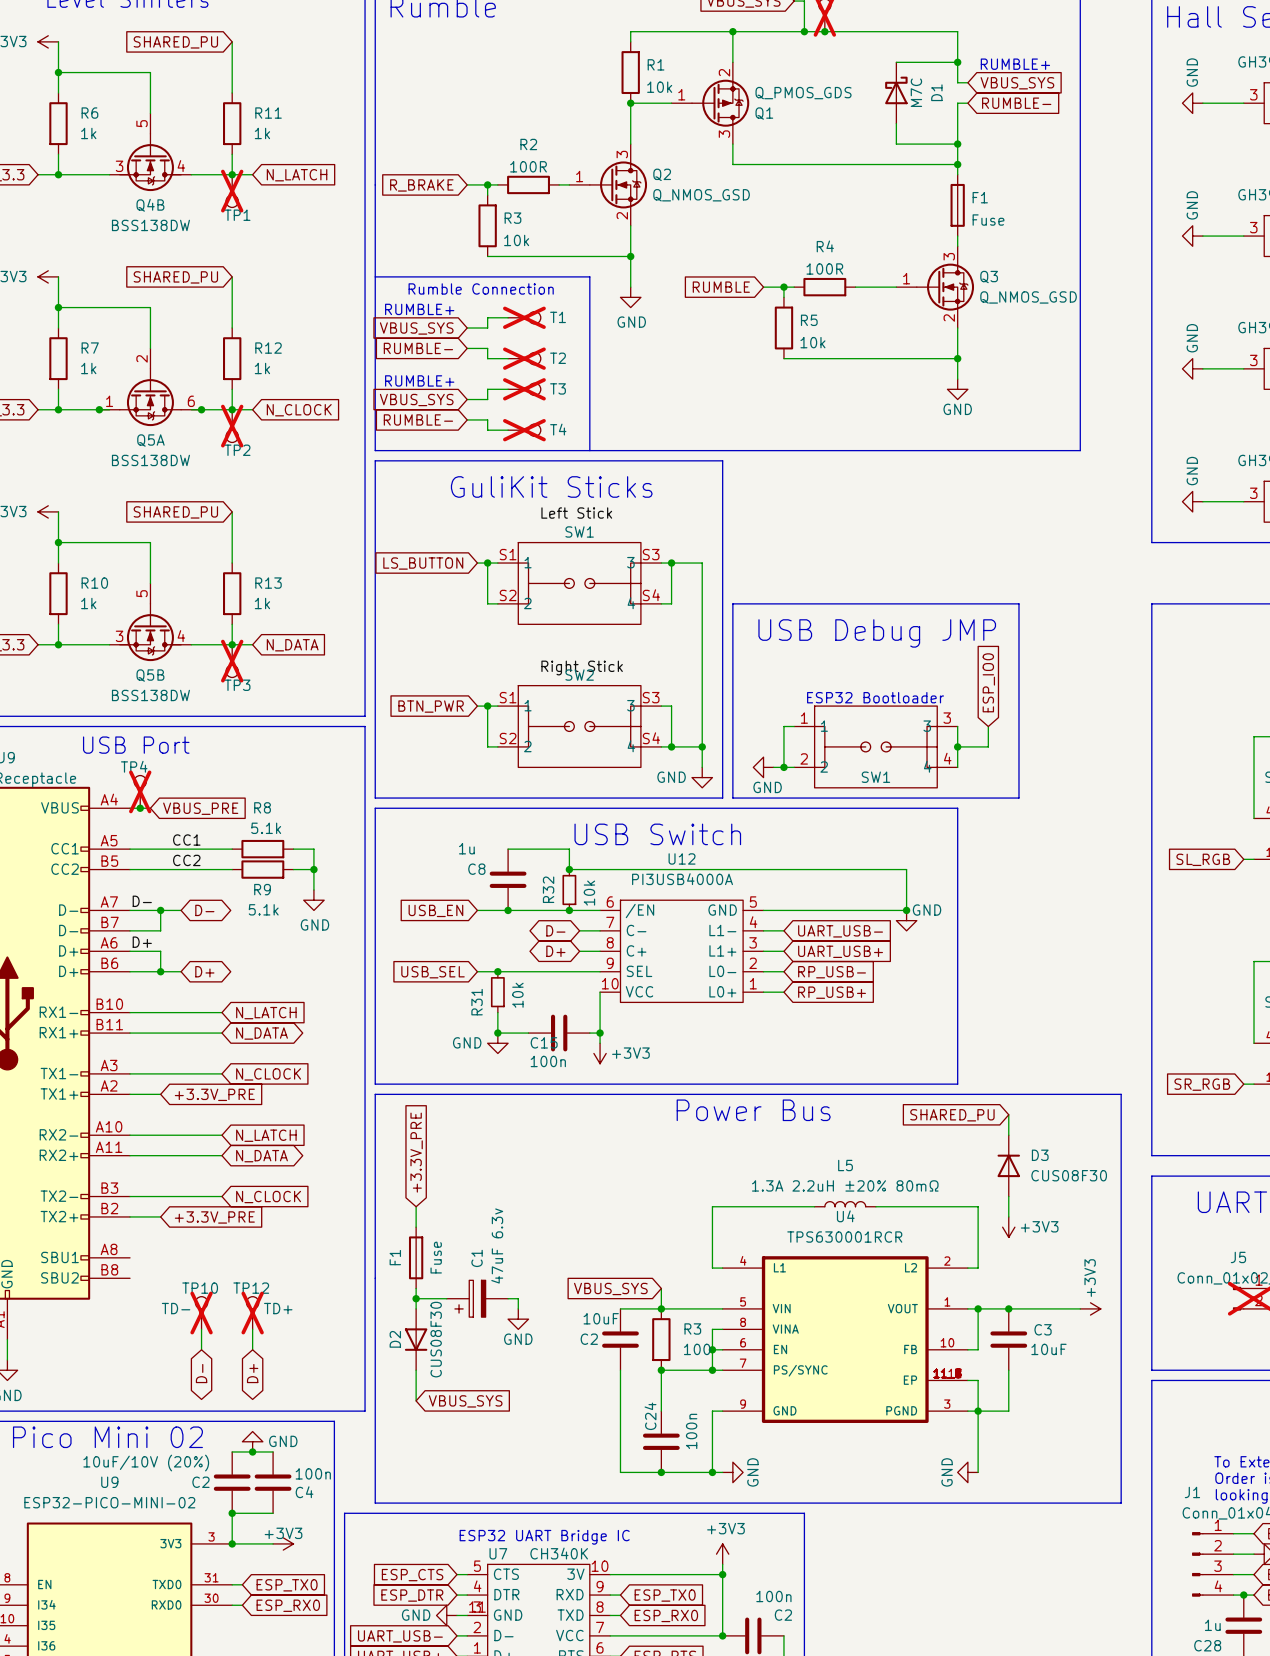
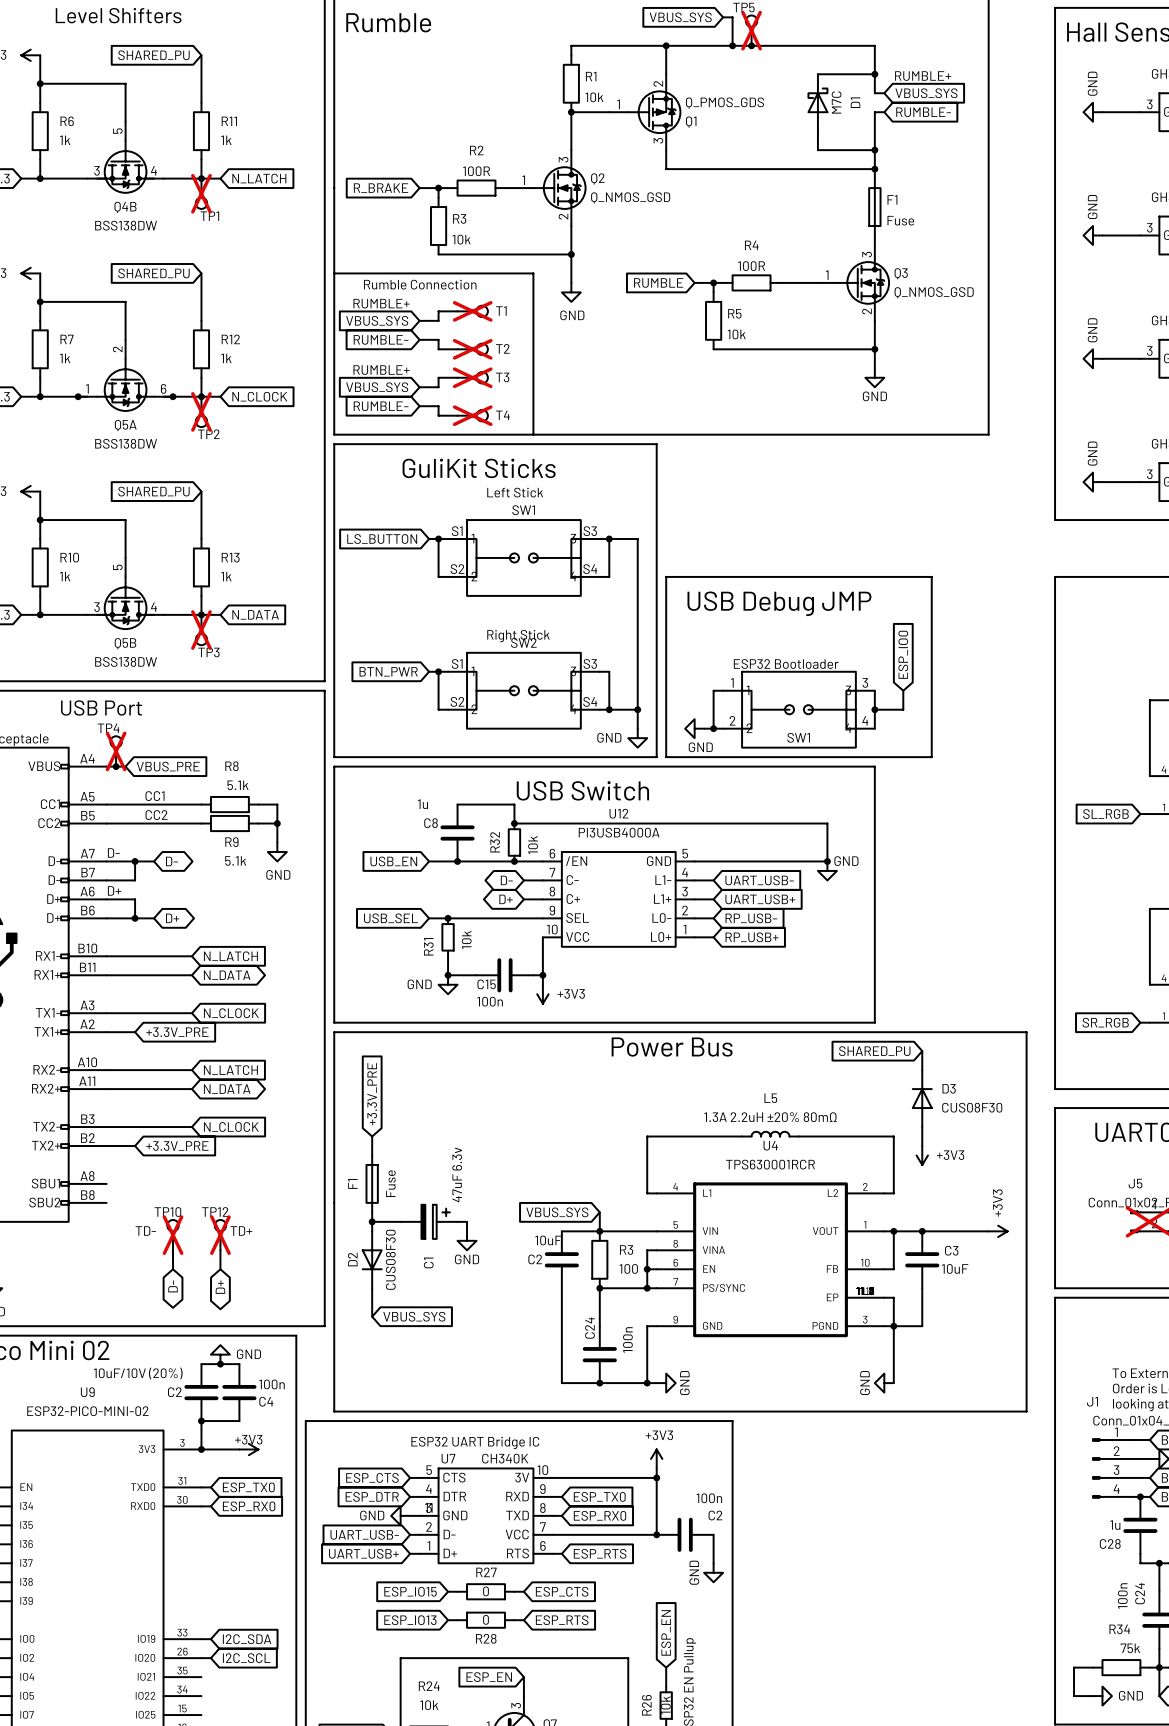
C1 value position: 47uF 6.3v (497, 1246) -> 47uF 6.3v (457, 1174)
C1 rotation: 0° (470, 1298) -> 180° (435, 1221)

